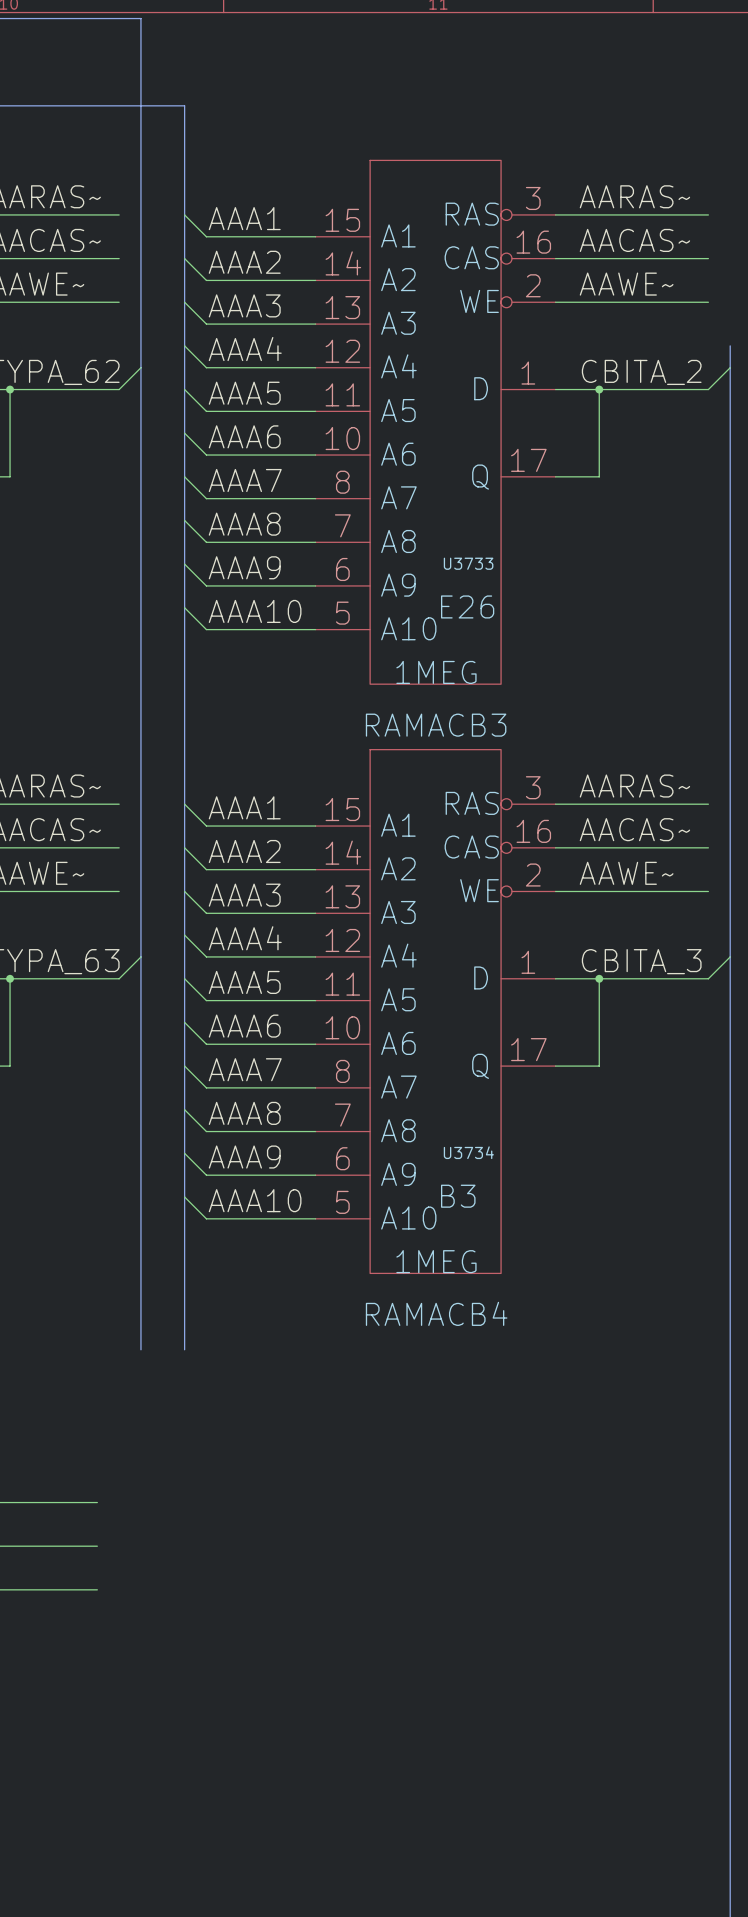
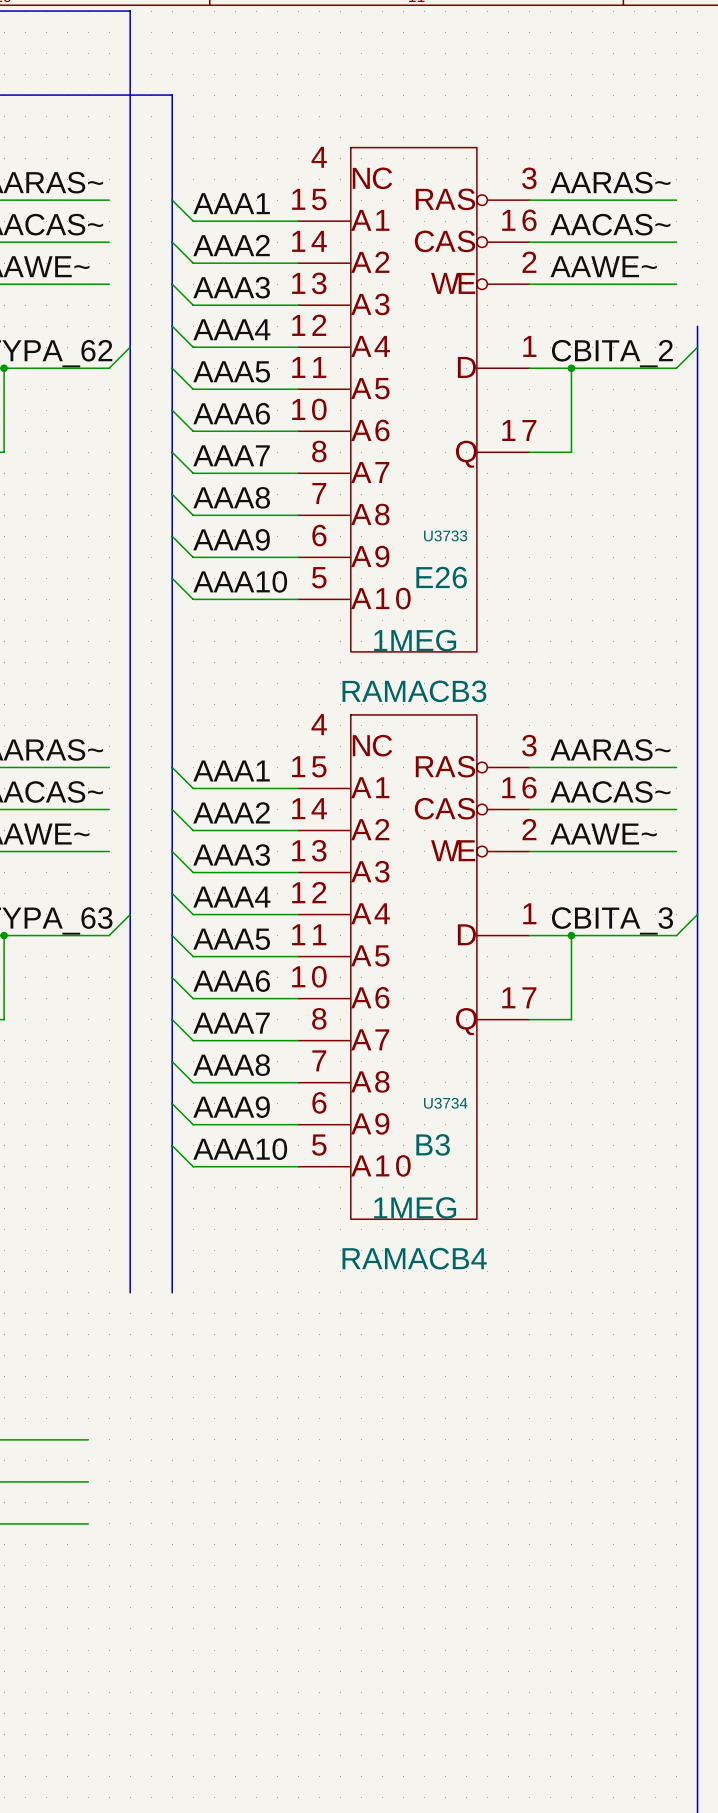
U3733 symbol: [315, 160, 556, 685] -> [298, 147, 530, 652]
U3734 symbol: [315, 749, 556, 1274] -> [298, 714, 530, 1220]

